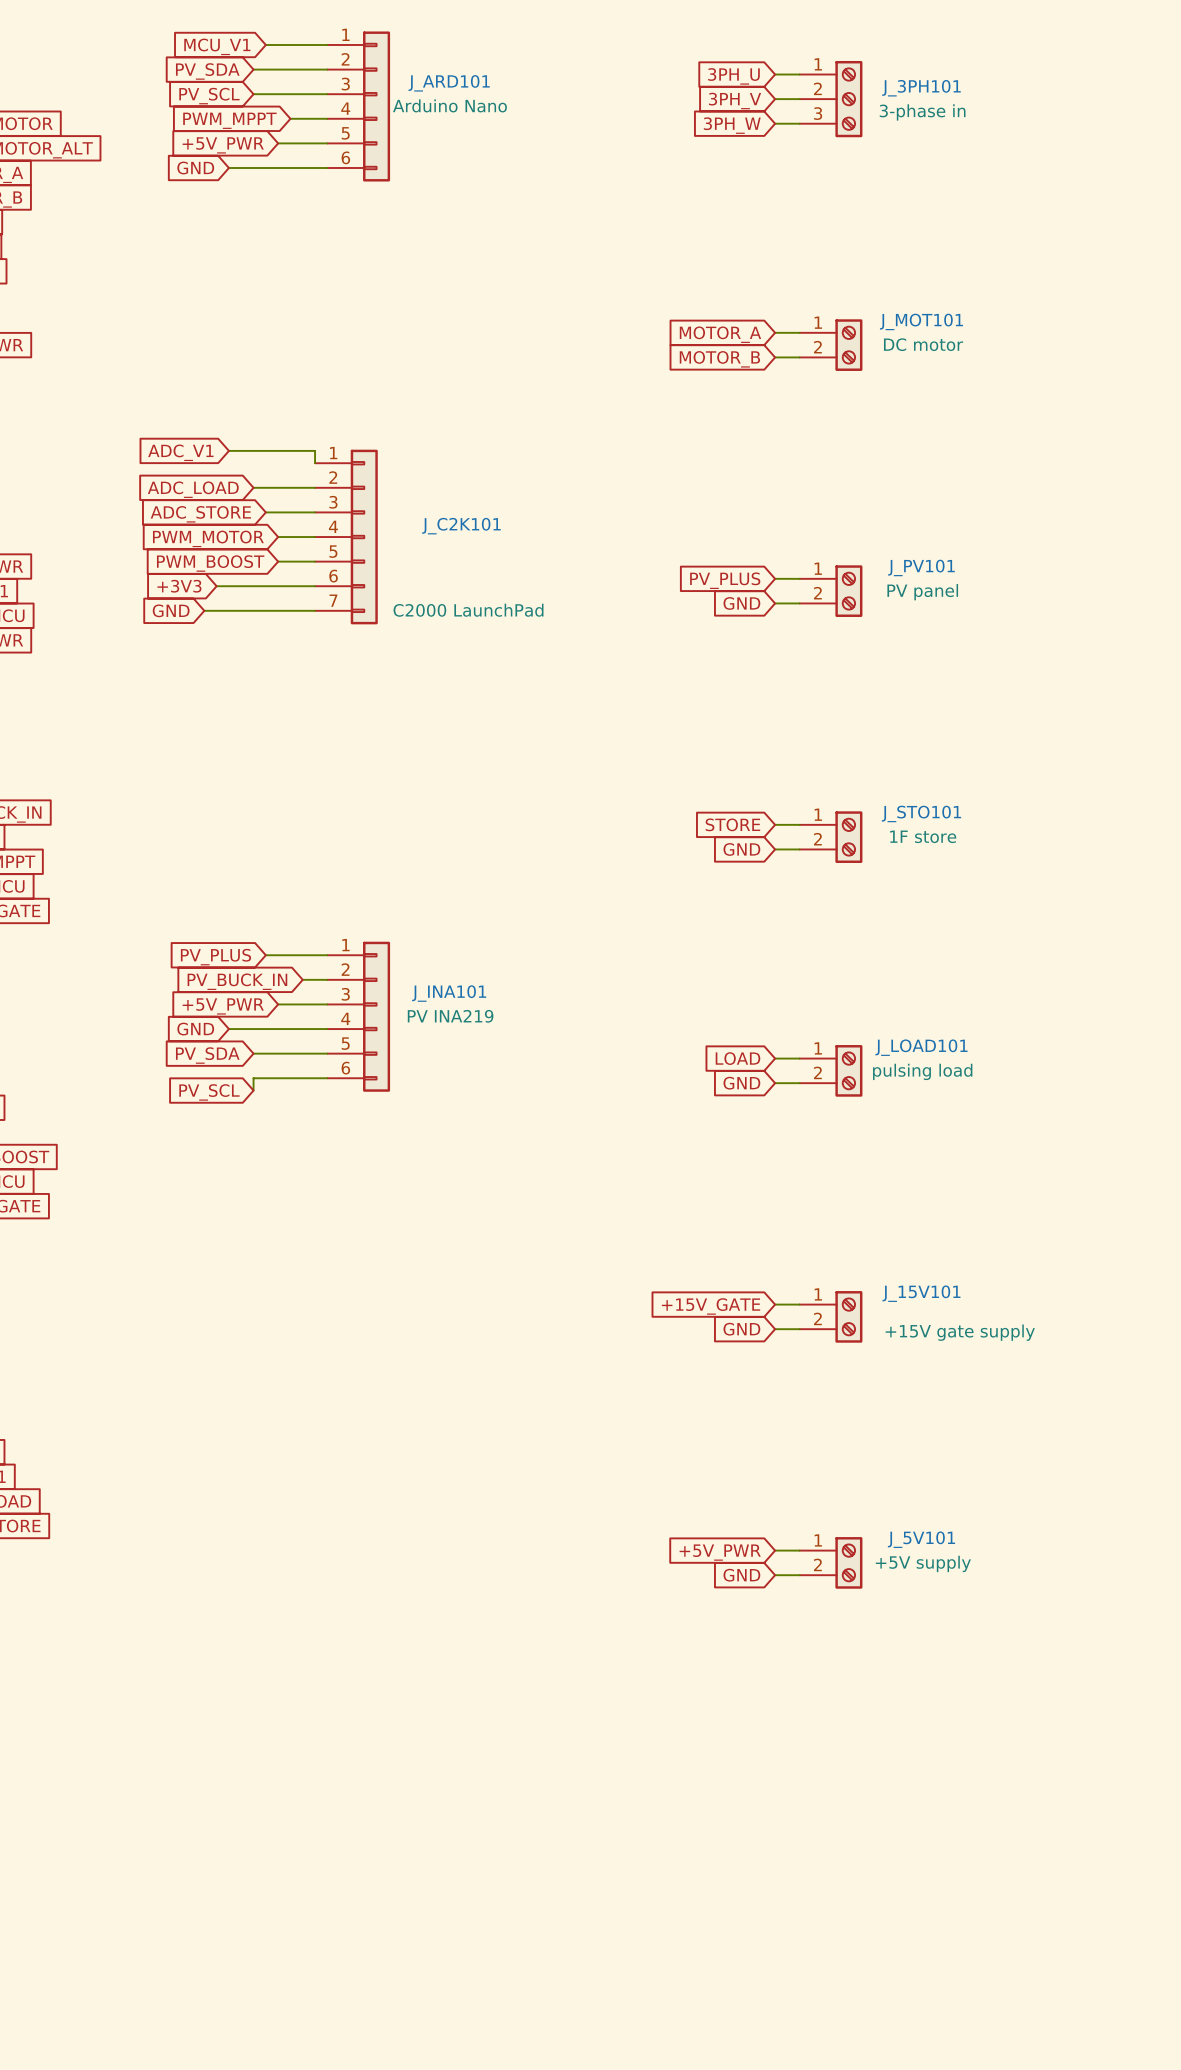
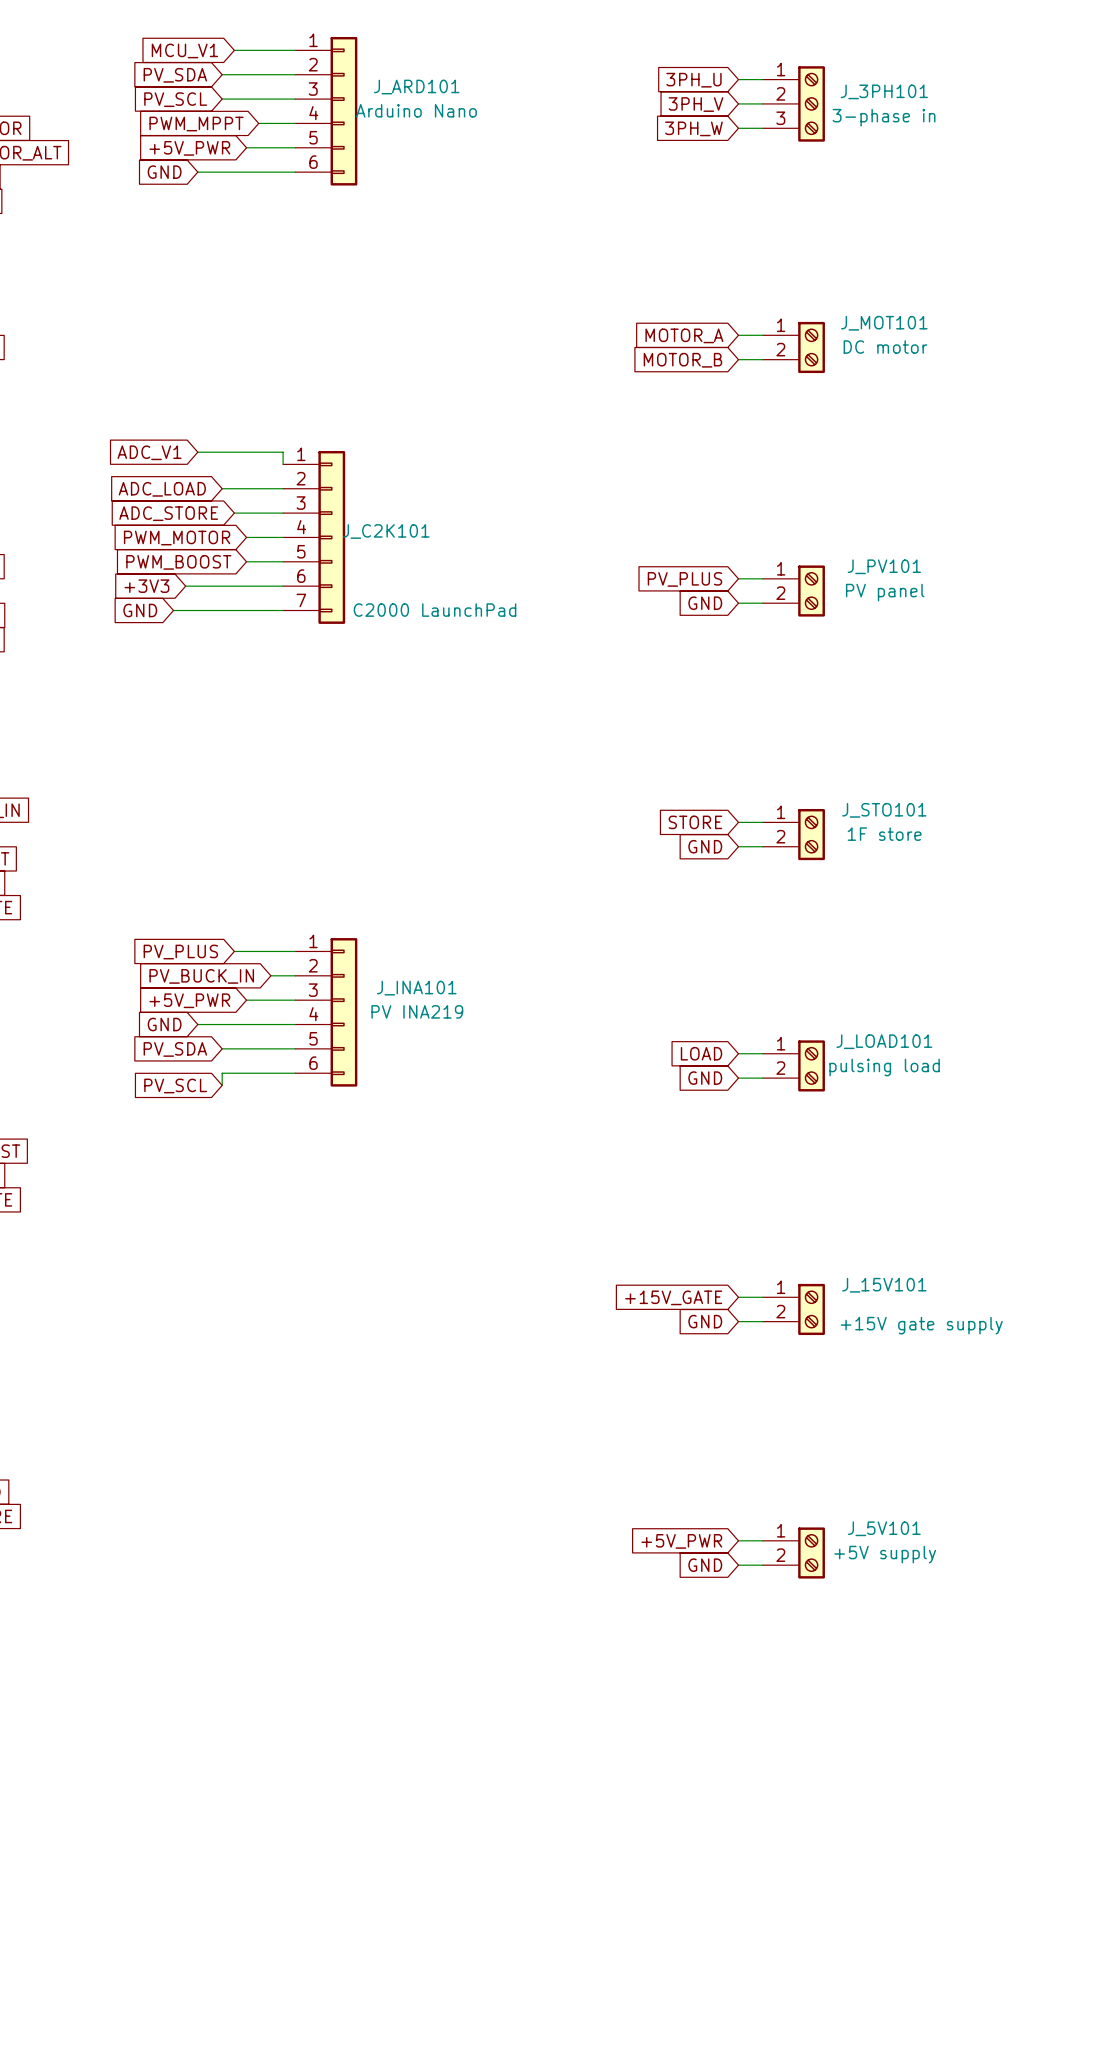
J_C2K101 name position: J_C2K101 (461, 526) -> J_C2K101 (386, 531)

